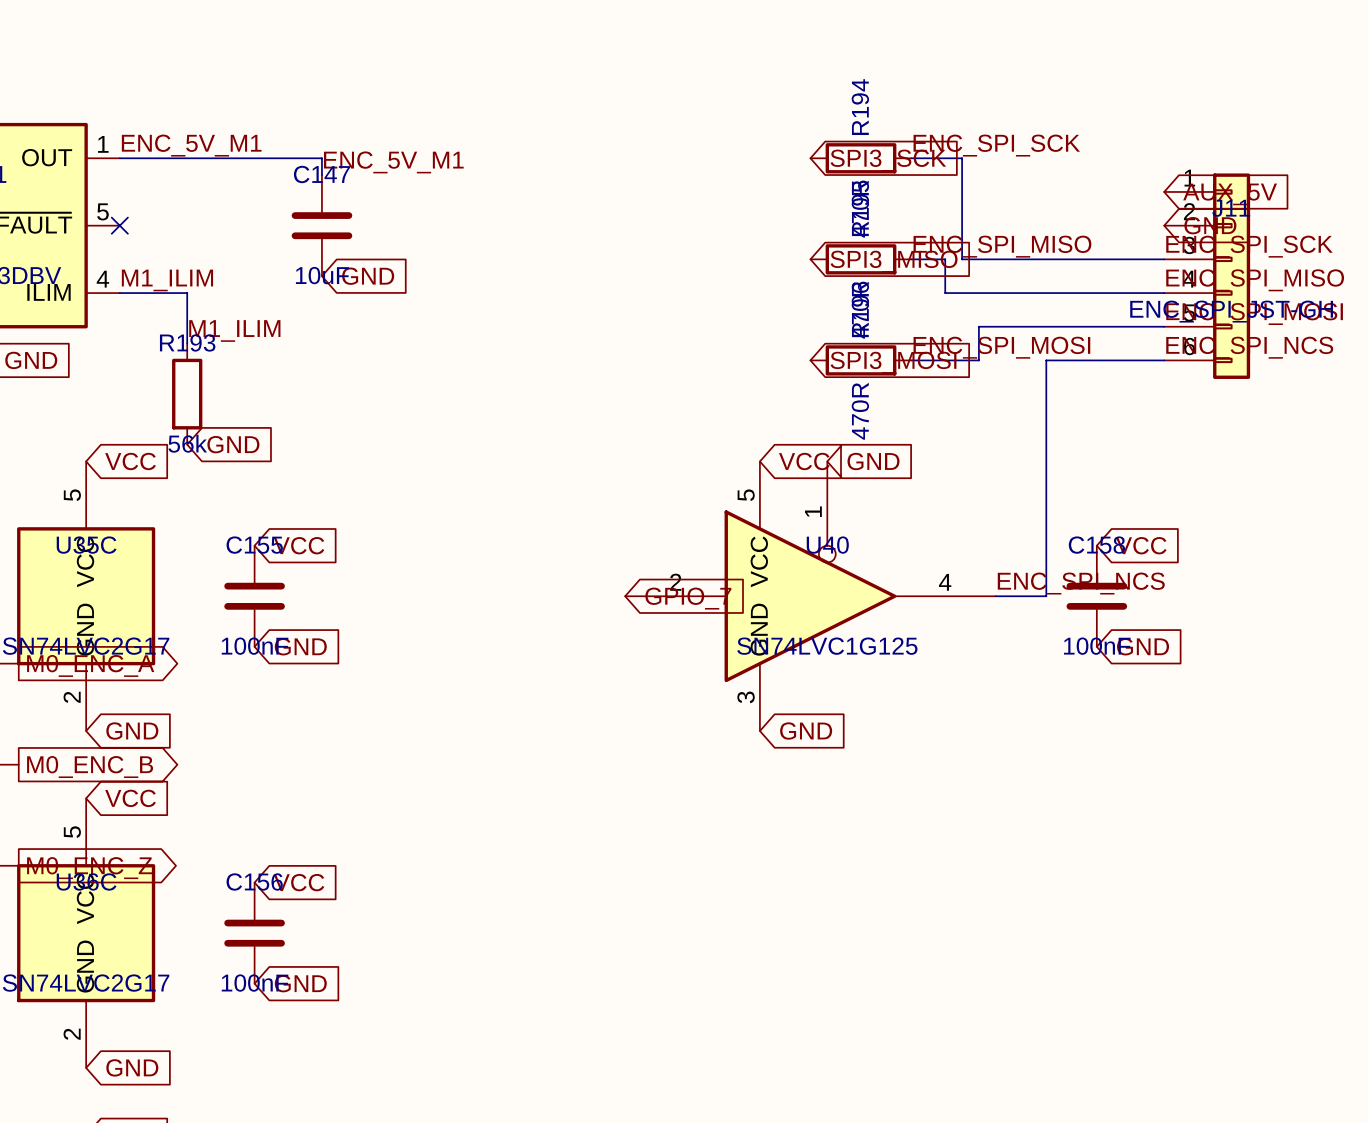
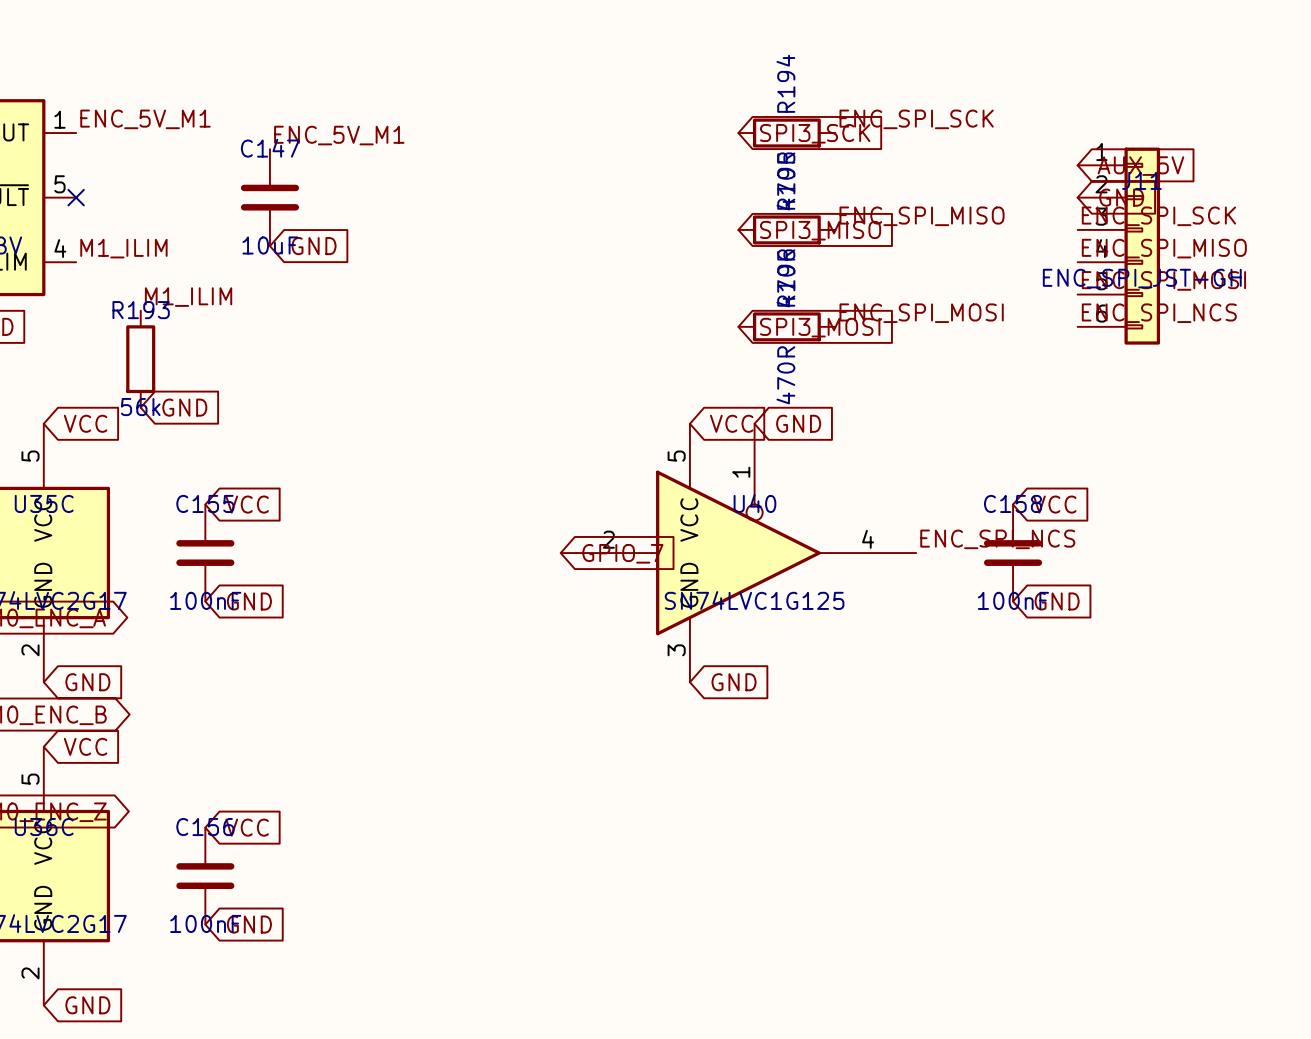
wire: (119, 158) (321, 158) (321, 175) -> none
wire: (911, 158) (962, 158) (962, 259) (1164, 259) -> none
wire: (911, 259) (945, 259) (945, 293) (1164, 293) -> none
wire: (119, 293) (187, 293) (187, 343) -> none
wire: (1164, 326) (978, 326) (978, 360) (911, 360) -> none
wire: (1164, 360) (1046, 360) (1046, 596) (995, 596) -> none

